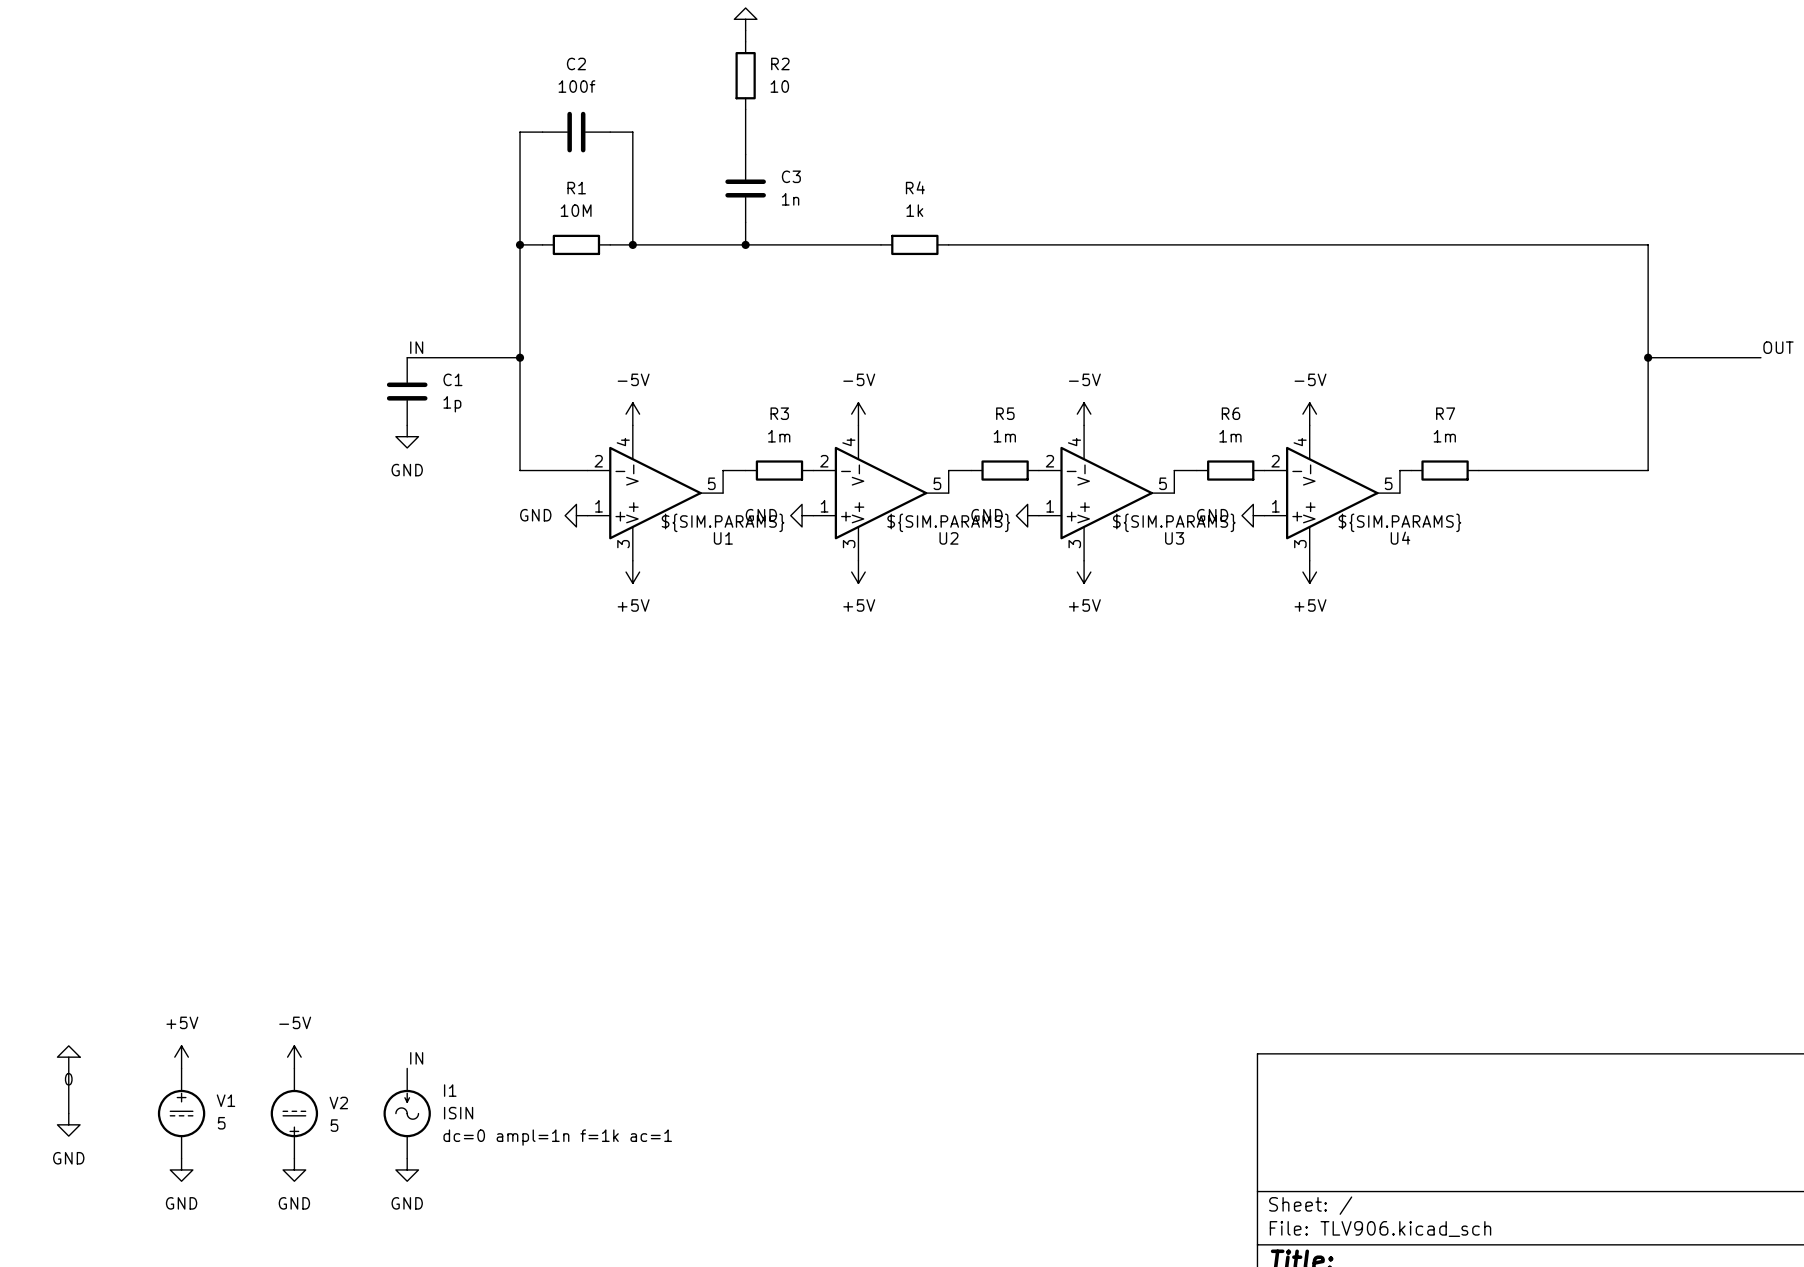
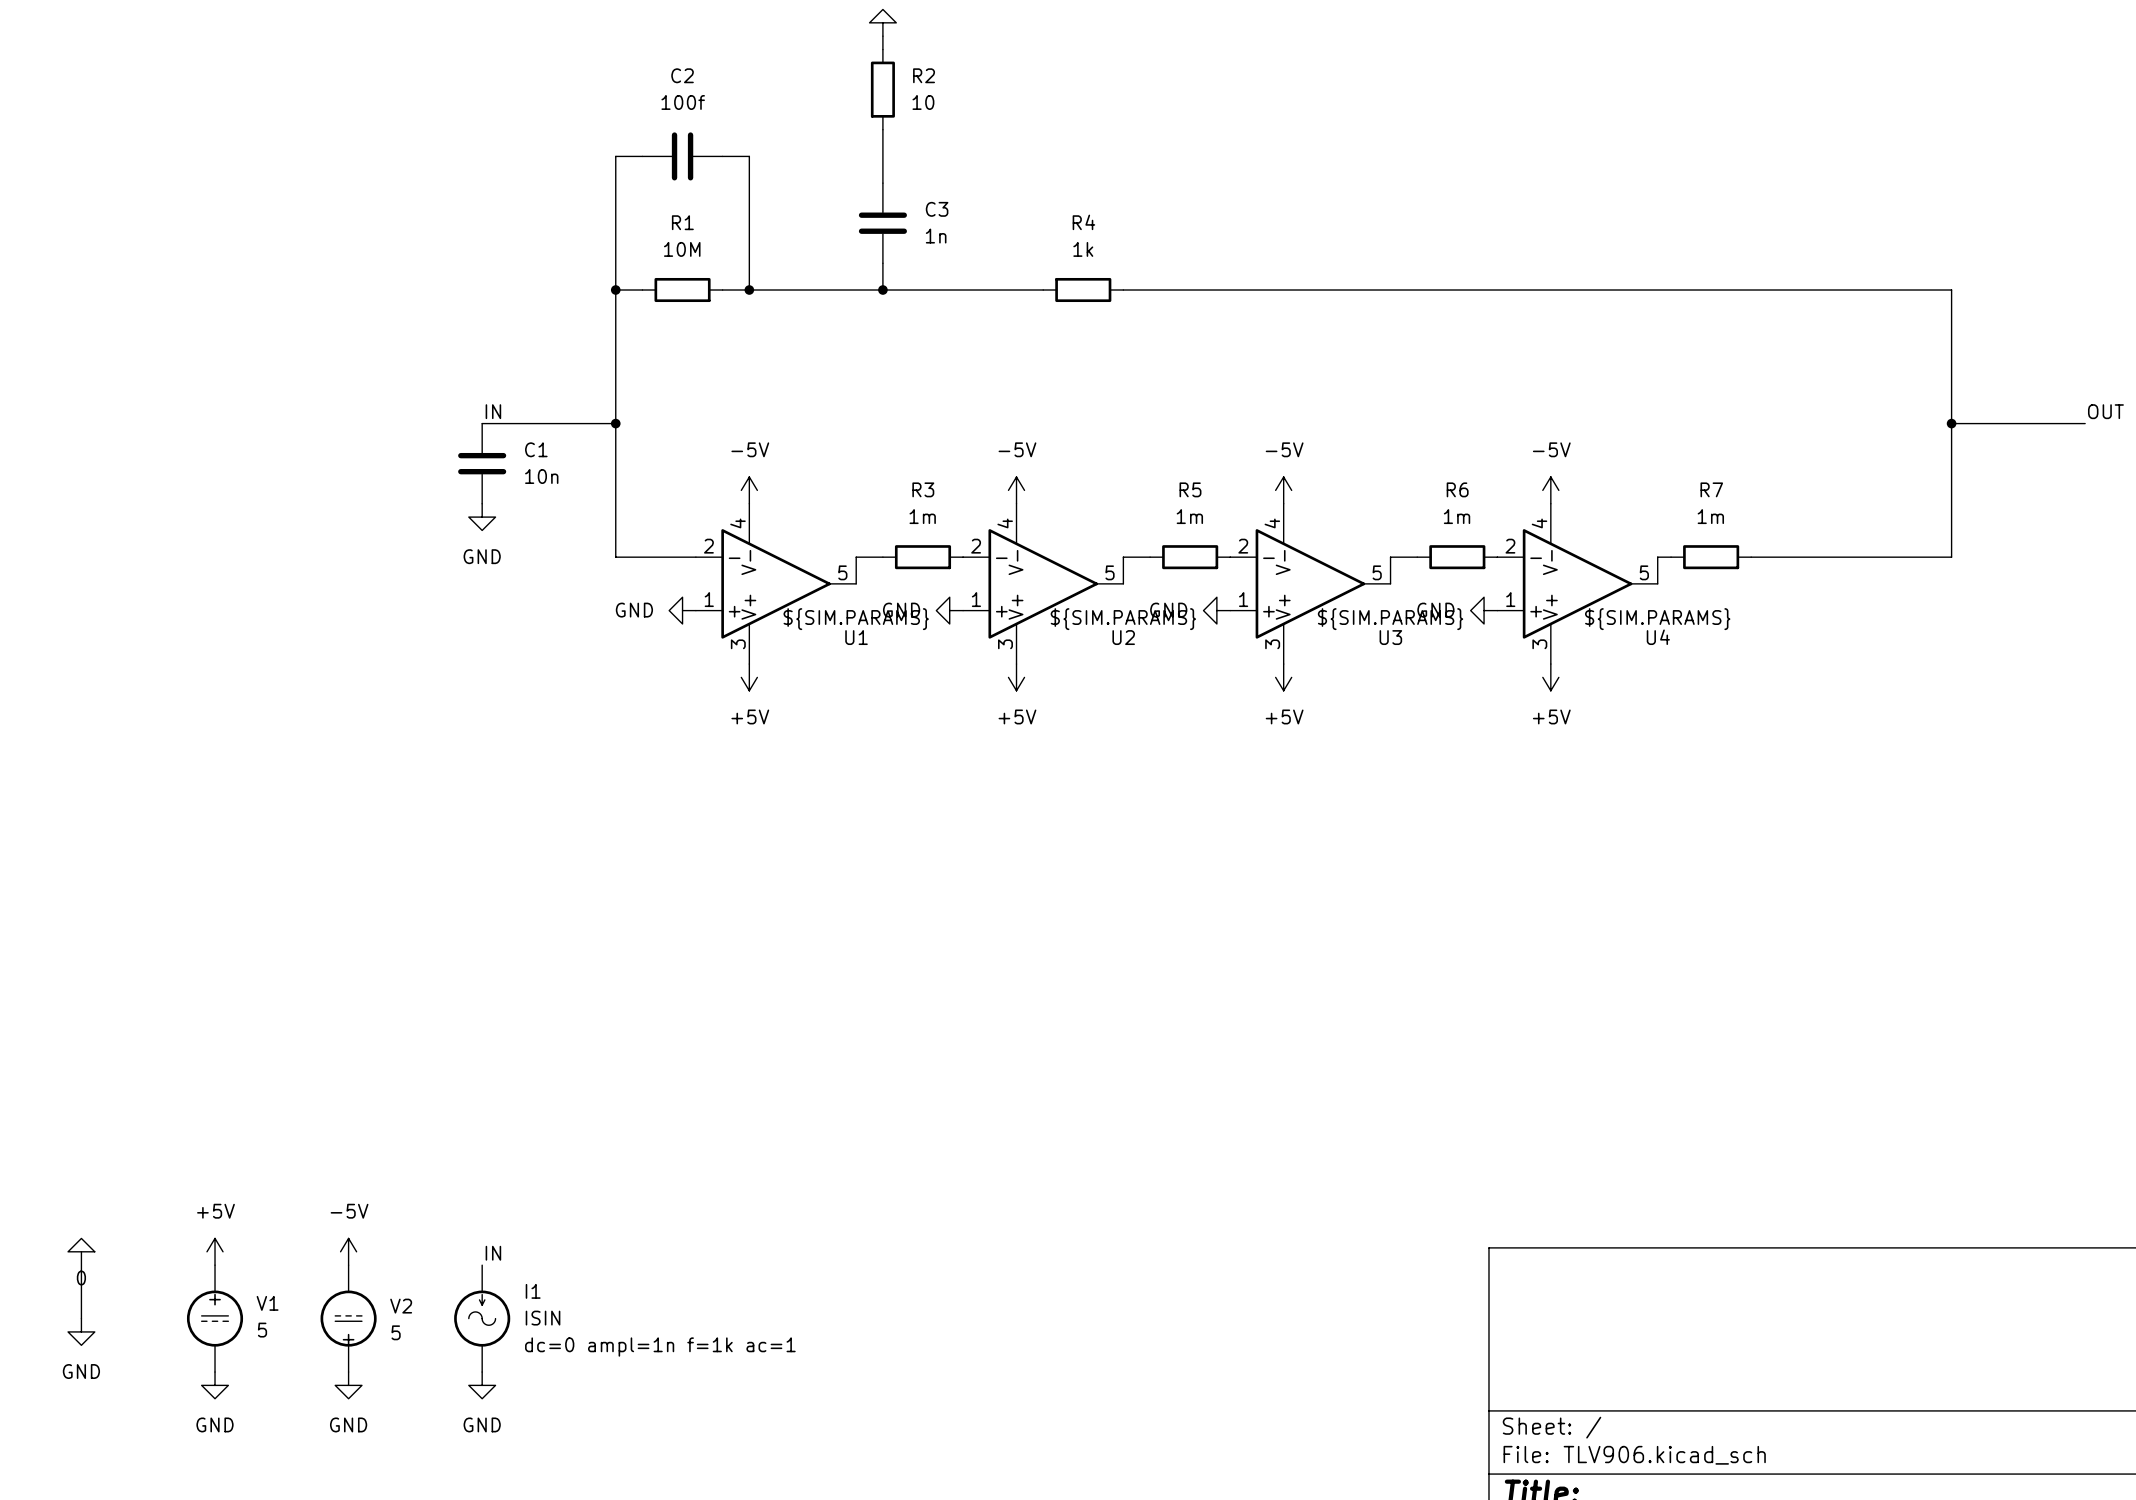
C1 value: 1p (452, 404) -> 10n (541, 476)

